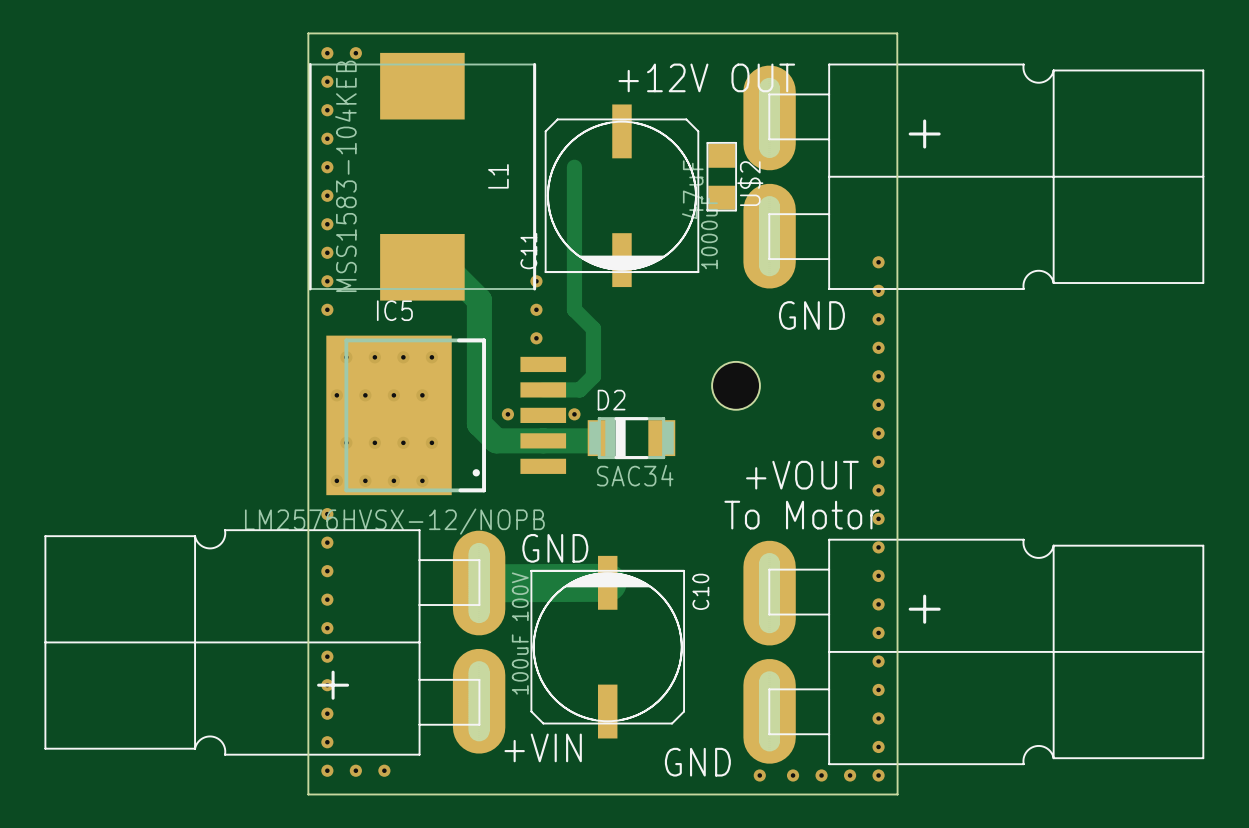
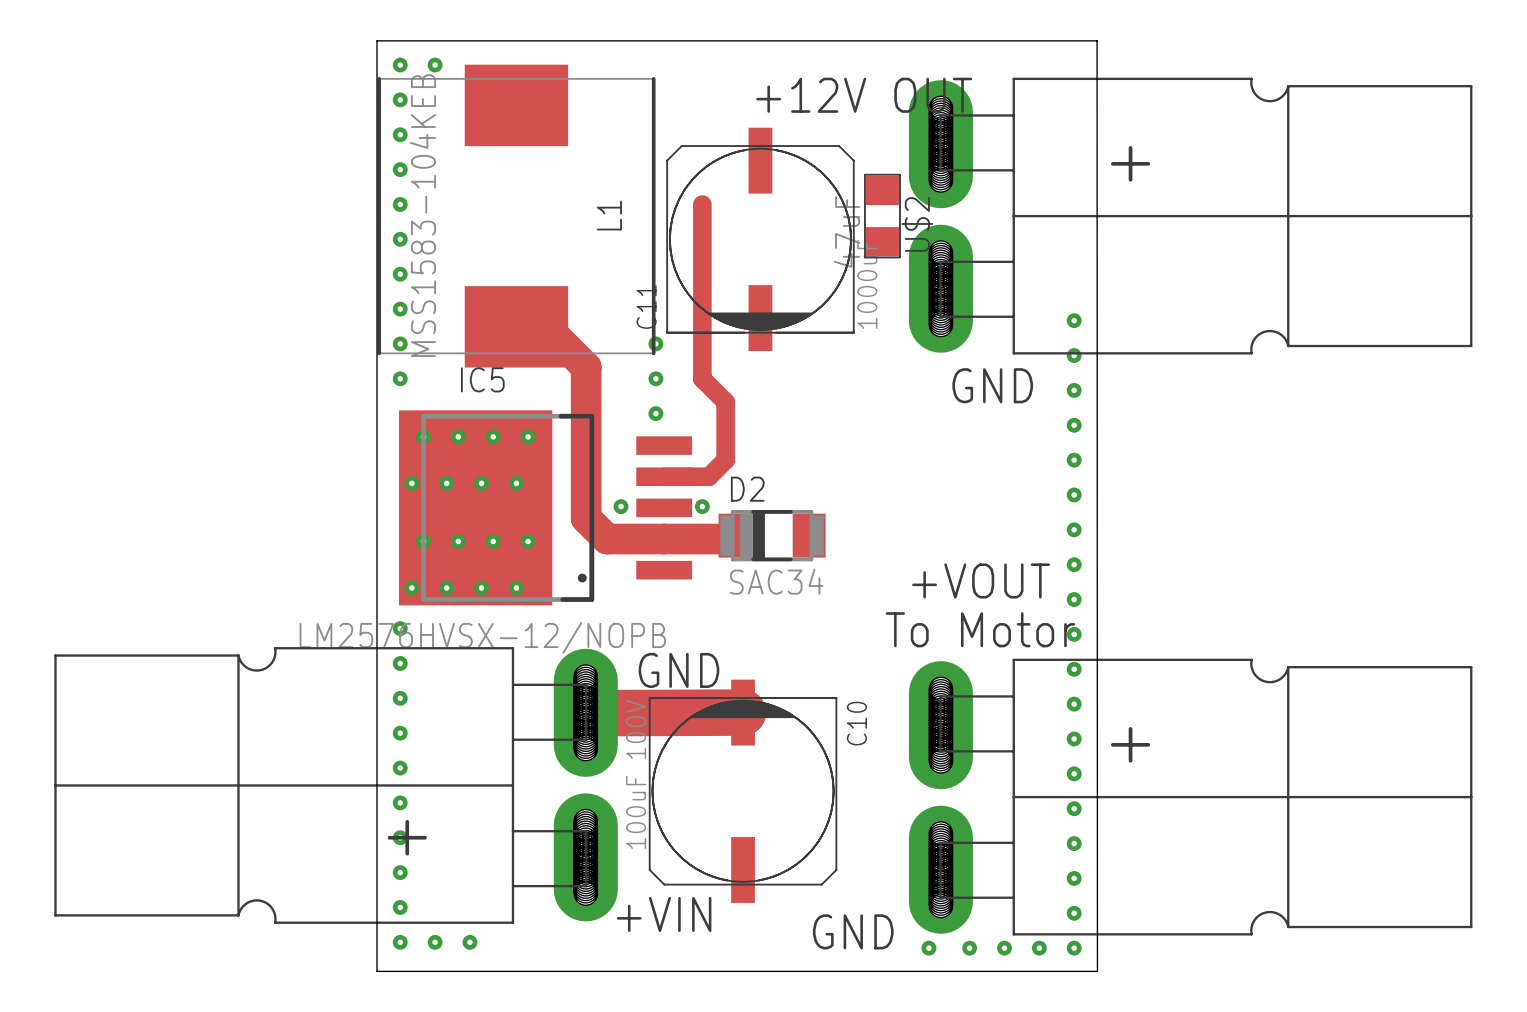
hole: (736, 385) -> none

